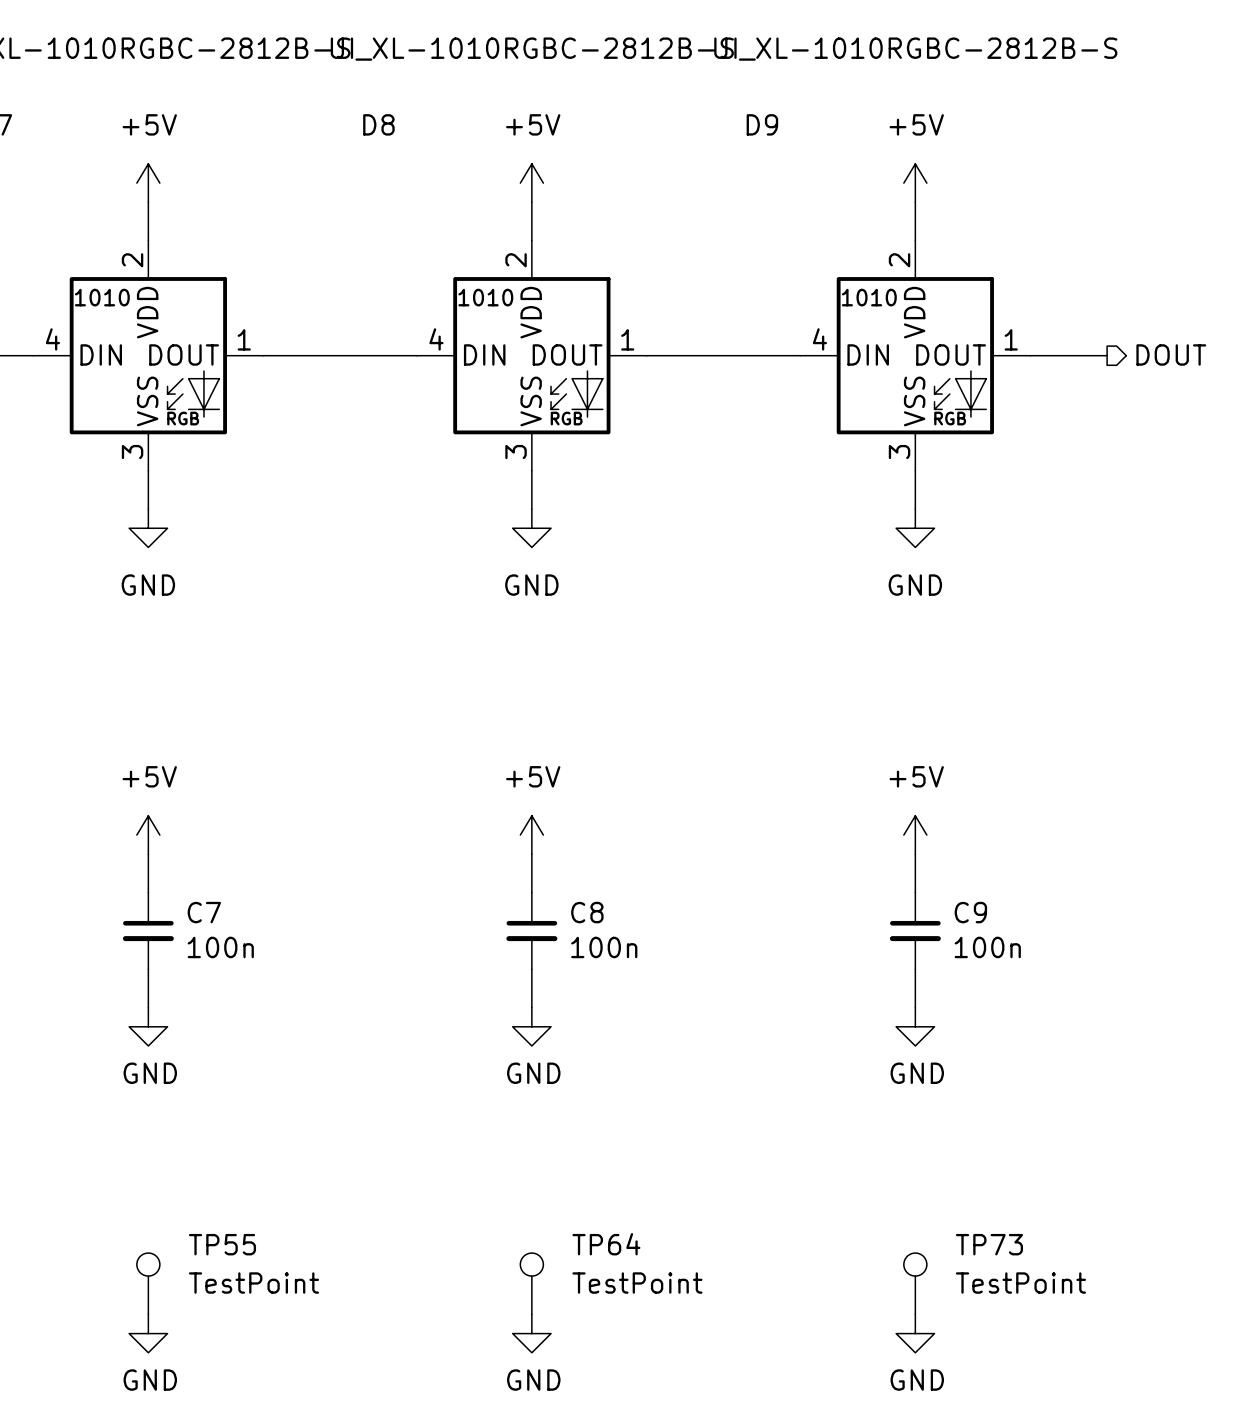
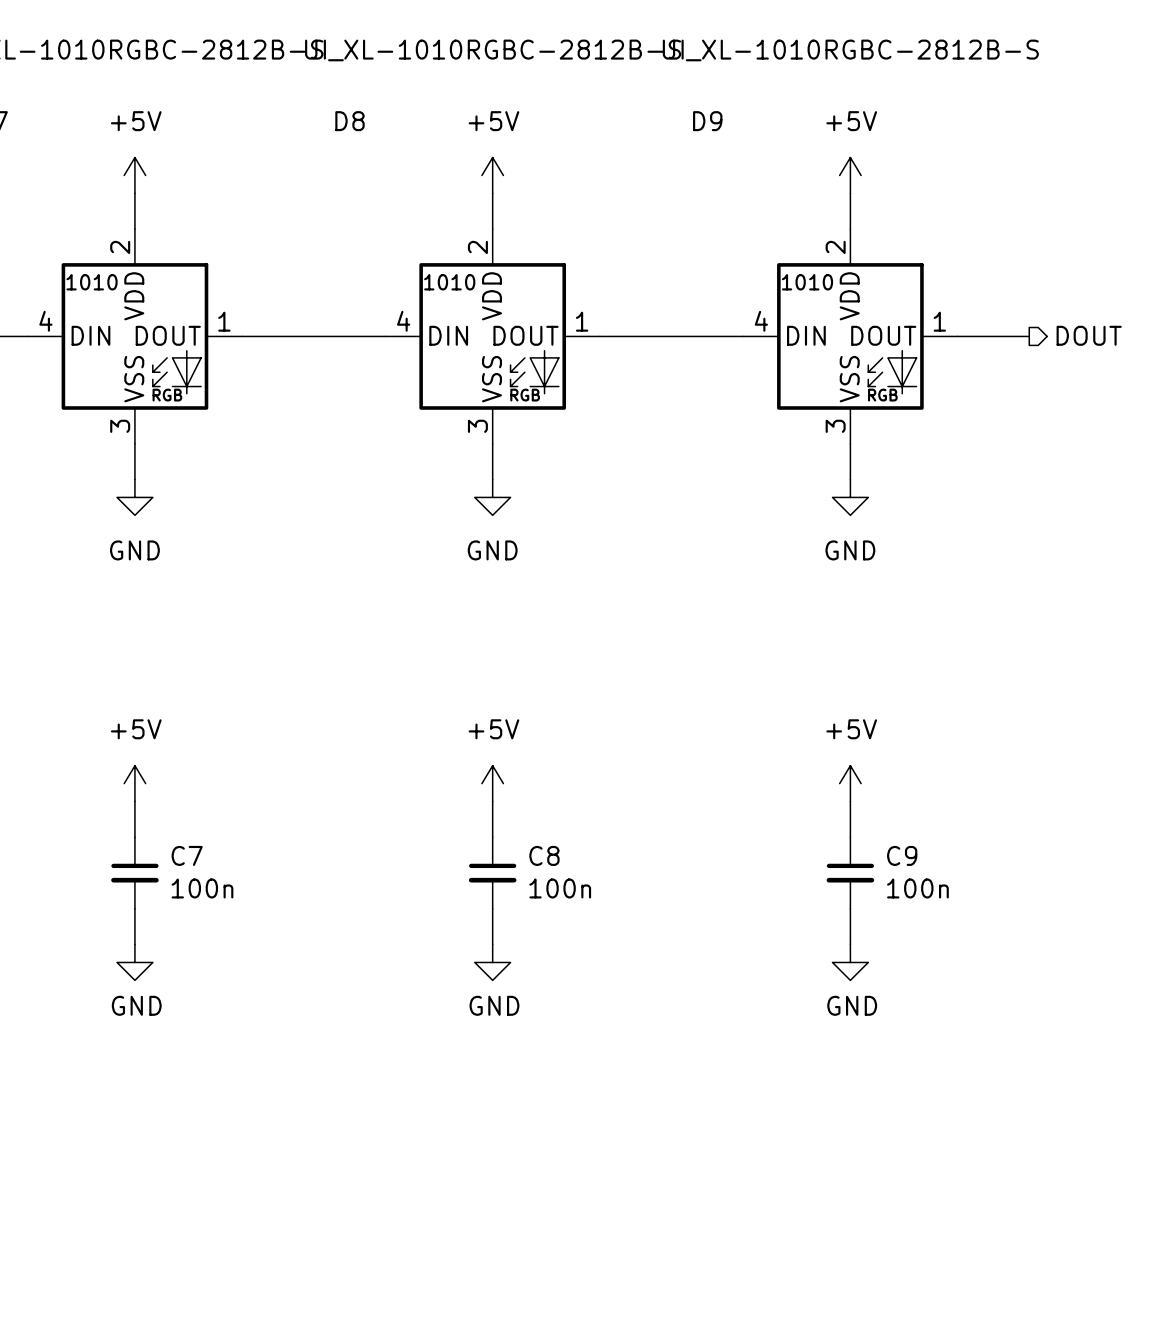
TP55: TestPoint (148, 1283) -> none
TP64: TestPoint (531, 1283) -> none
TP73: TestPoint (915, 1283) -> none
power symbol: GND (148, 1333) -> none
power symbol: GND (531, 1333) -> none
power symbol: GND (915, 1333) -> none

